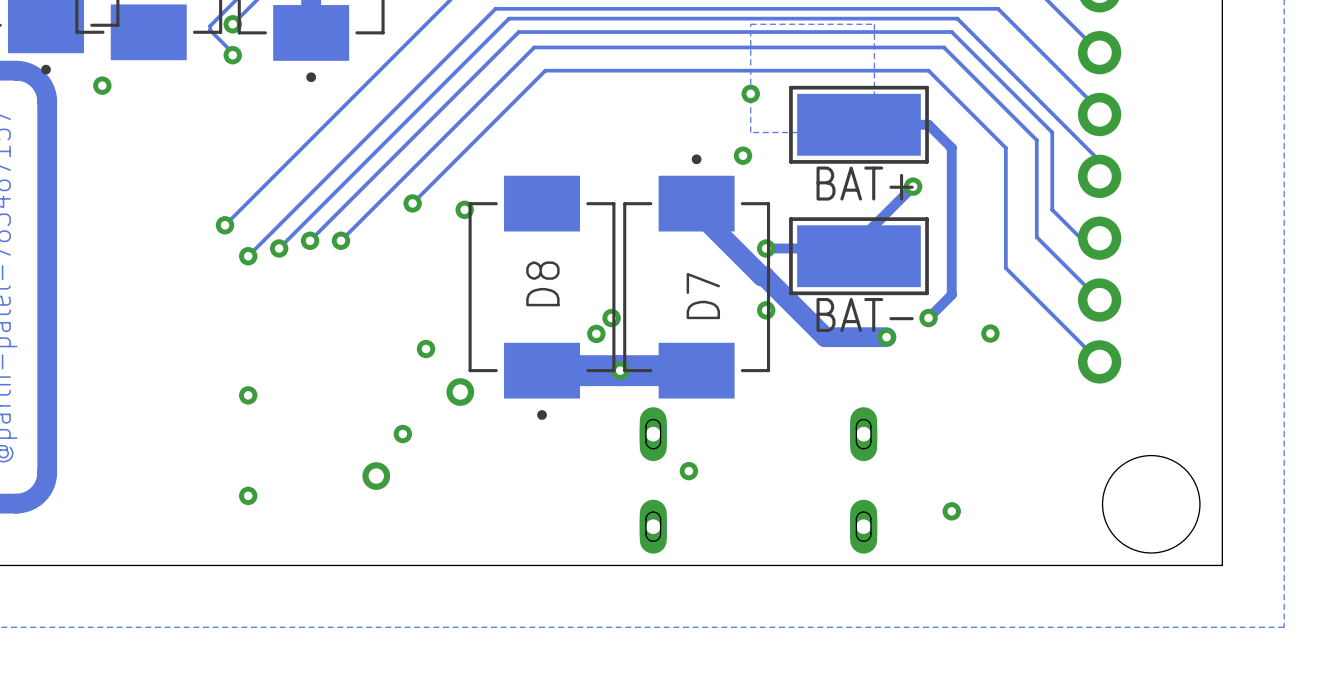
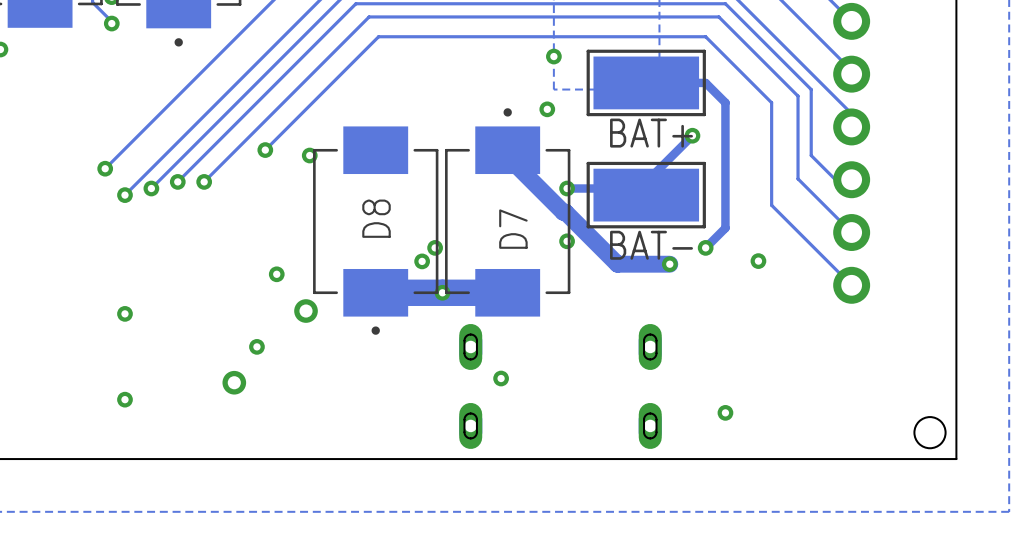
round board edge: [1102, 455, 1200, 553] -> none
round board edge: none -> [914, 417, 946, 449]

